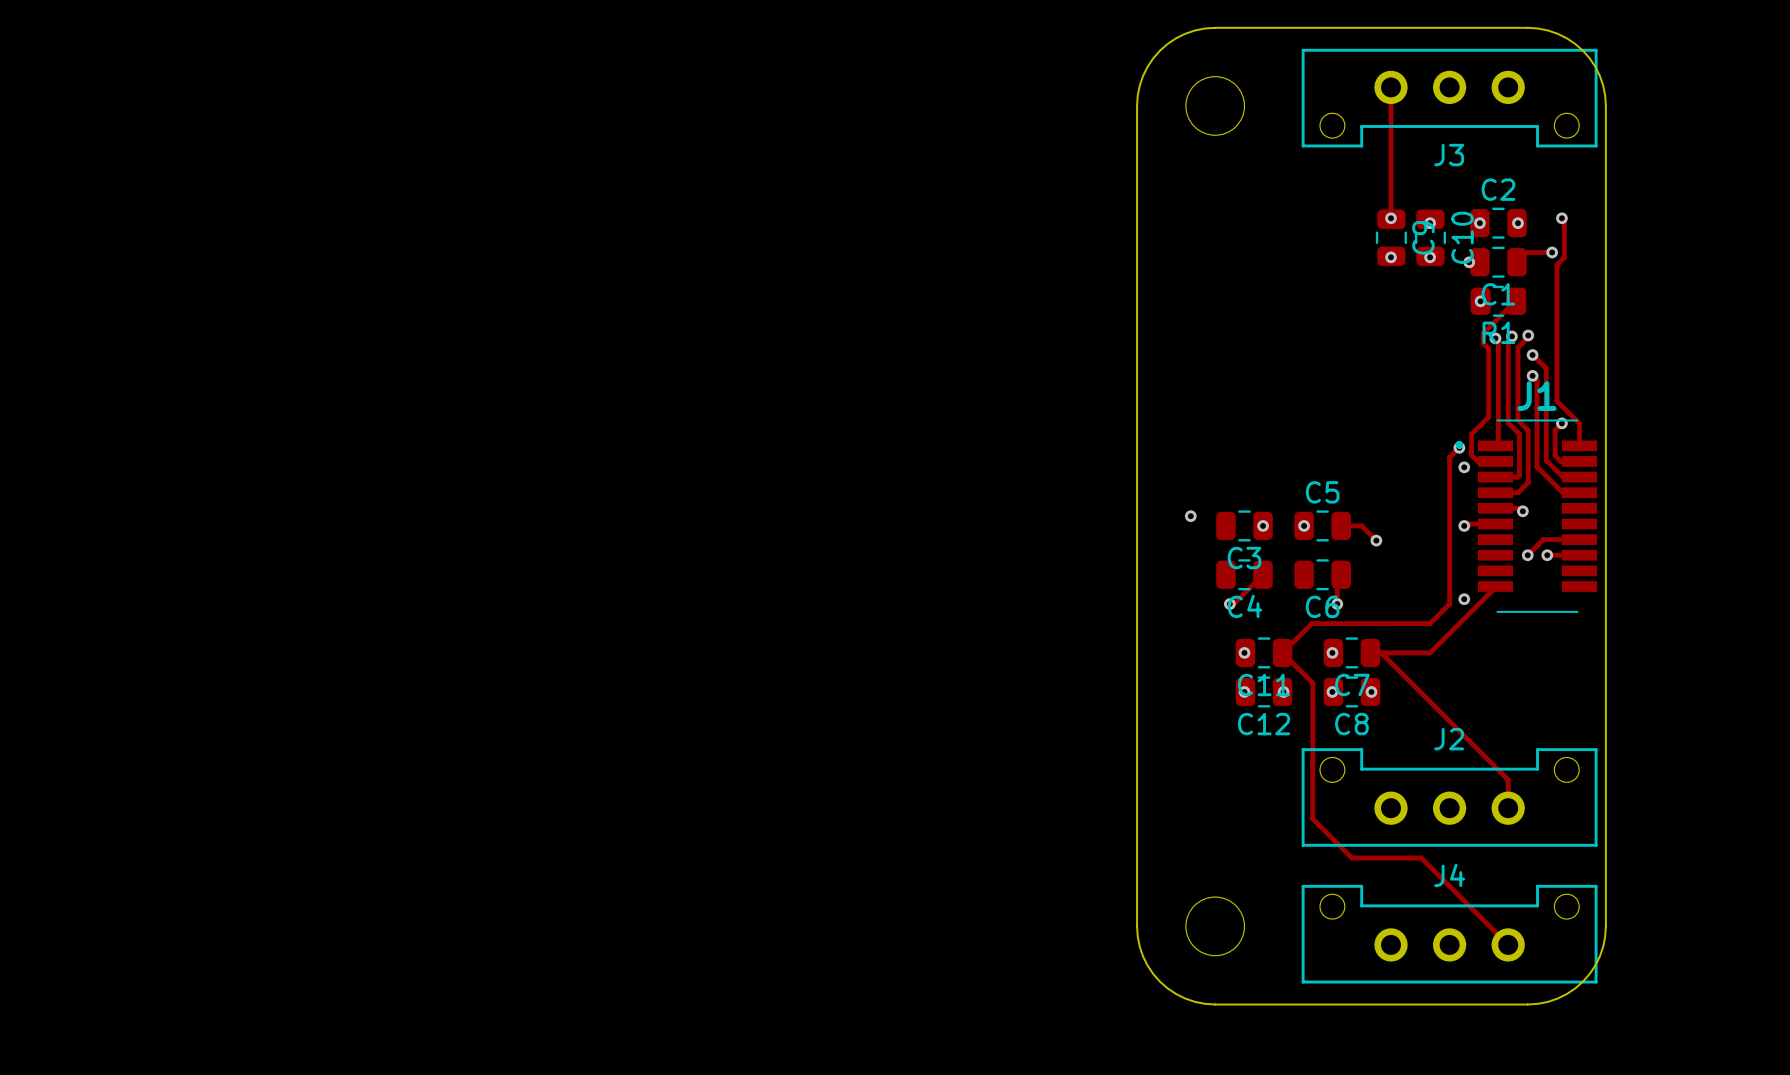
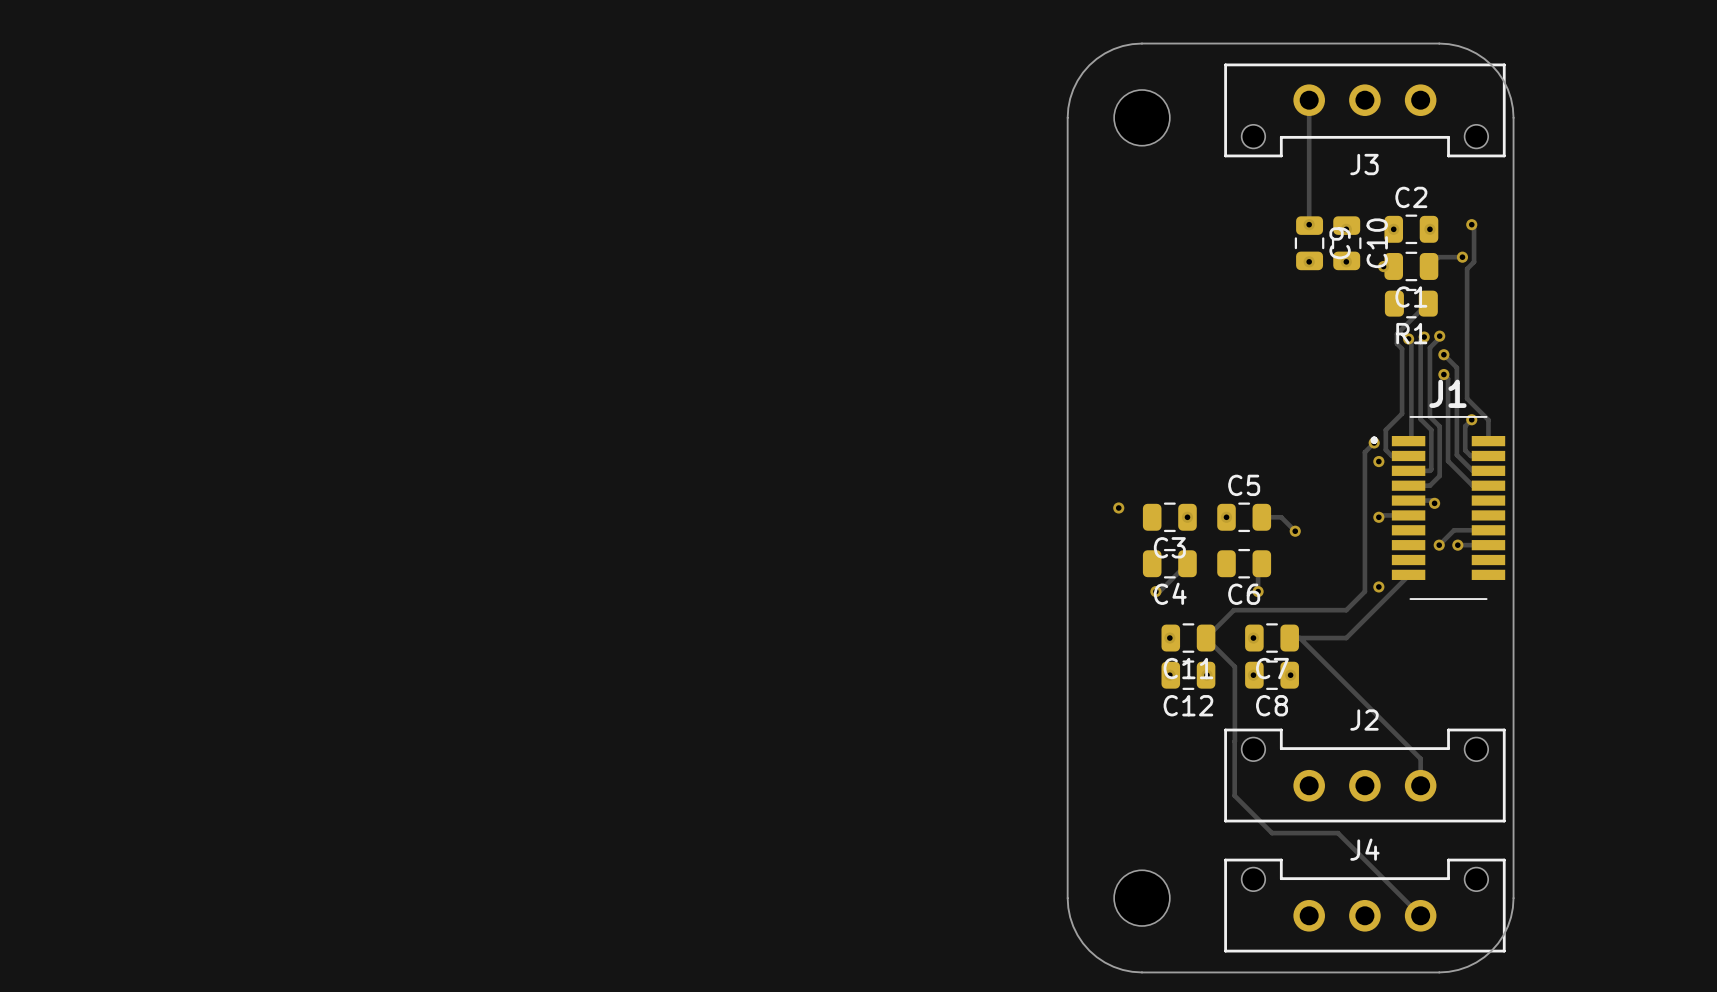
via: (1480, 301) -> none

